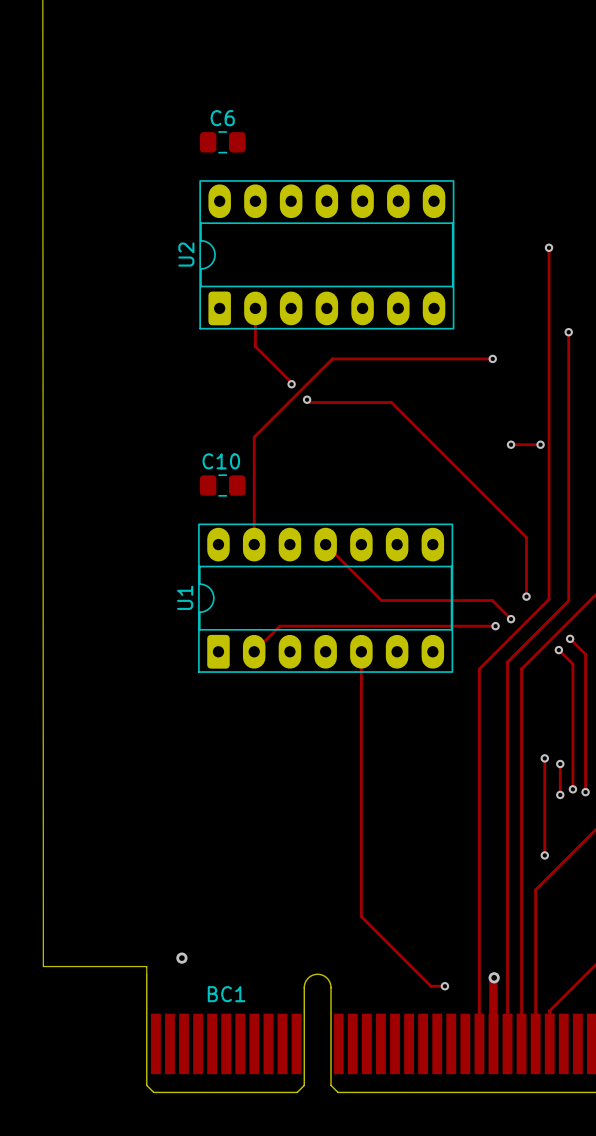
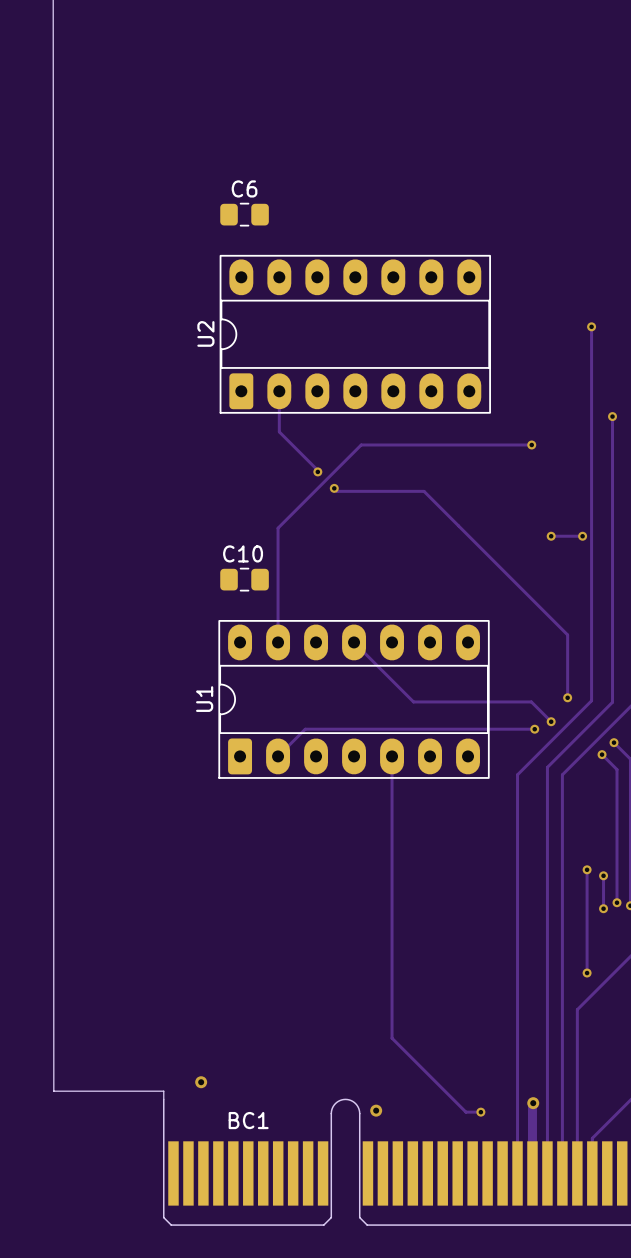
via: none -> (376, 1110)

